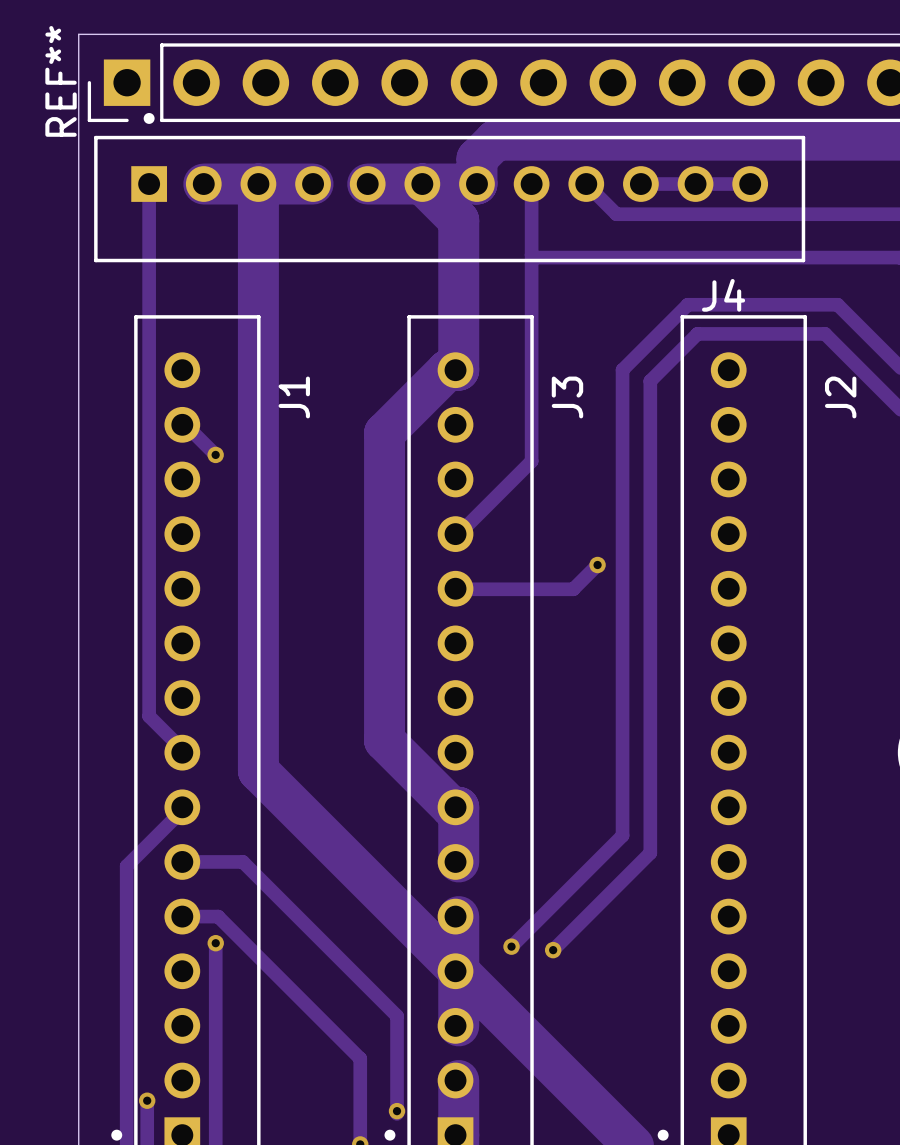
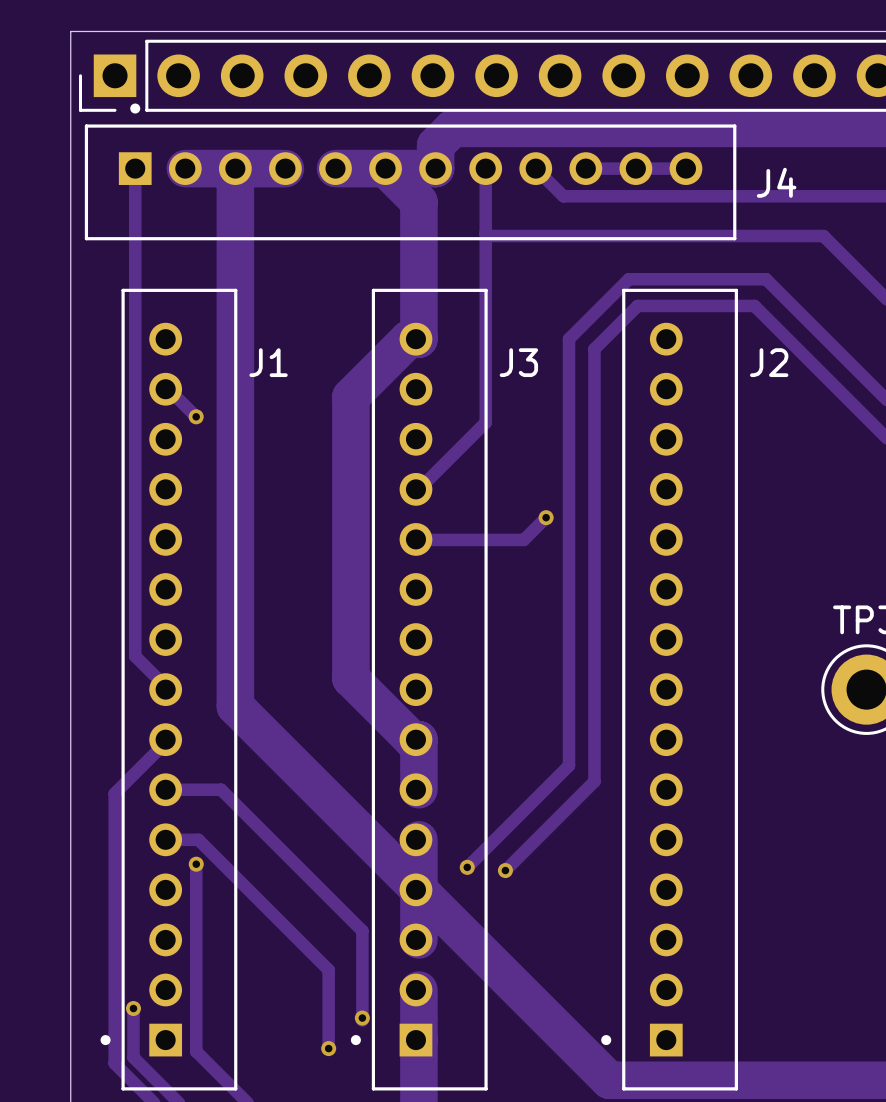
REF** name: REF** (61, 81) -> none
J4 name position: J4 (723, 295) -> J4 (776, 182)
J1 name rotation: 0° (294, 397) -> 90° clockwise (268, 362)
J3 name rotation: 0° (567, 397) -> 90° clockwise (518, 362)
J2 name rotation: 0° (840, 397) -> 90° clockwise (769, 362)

